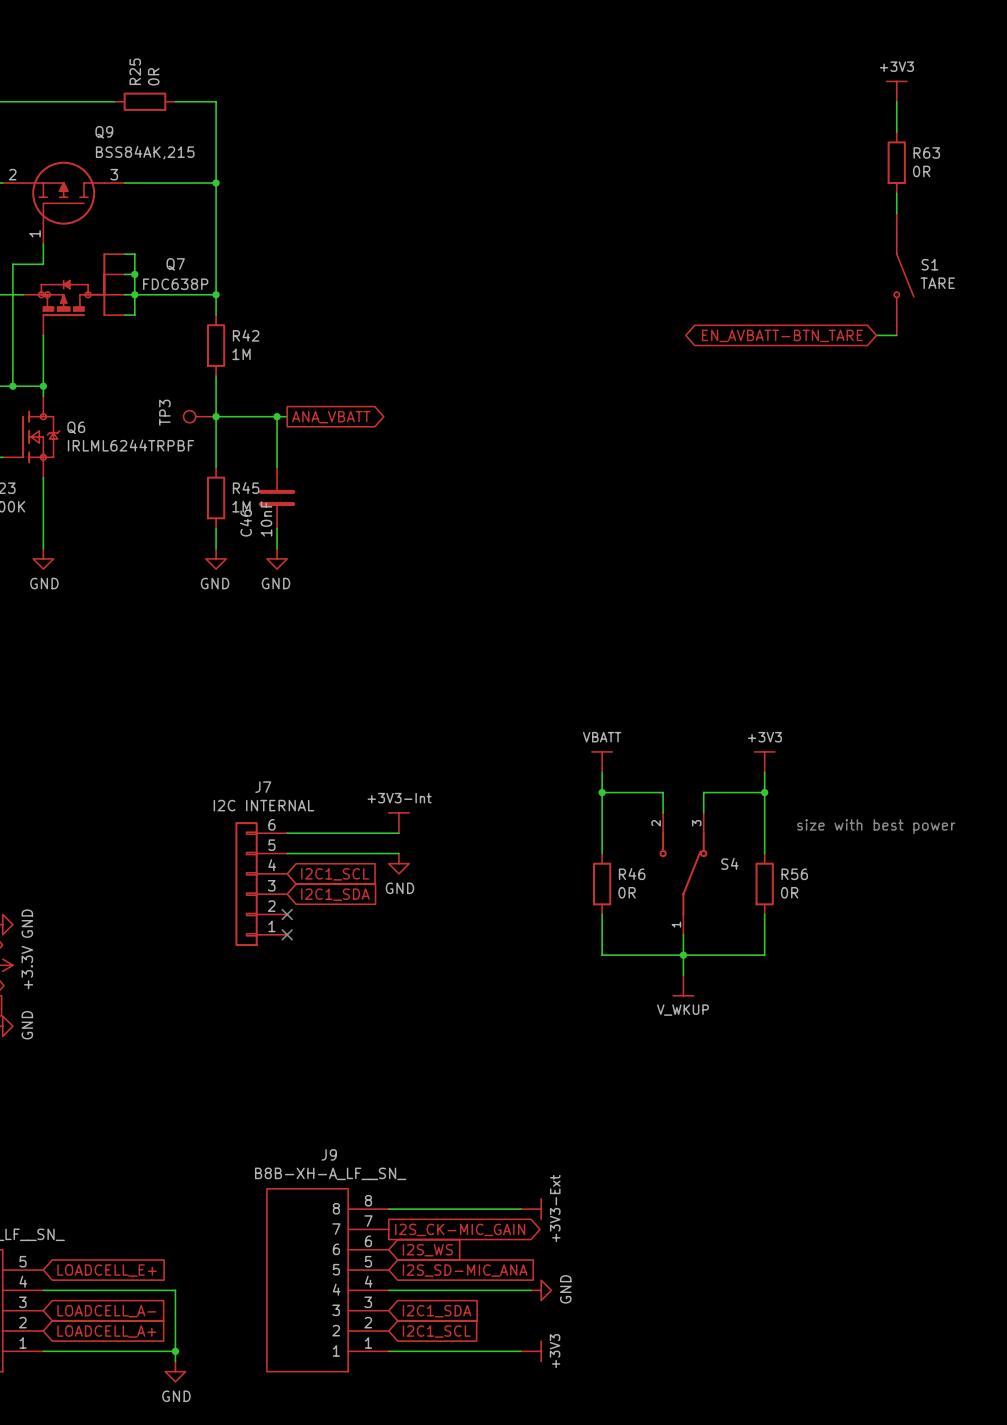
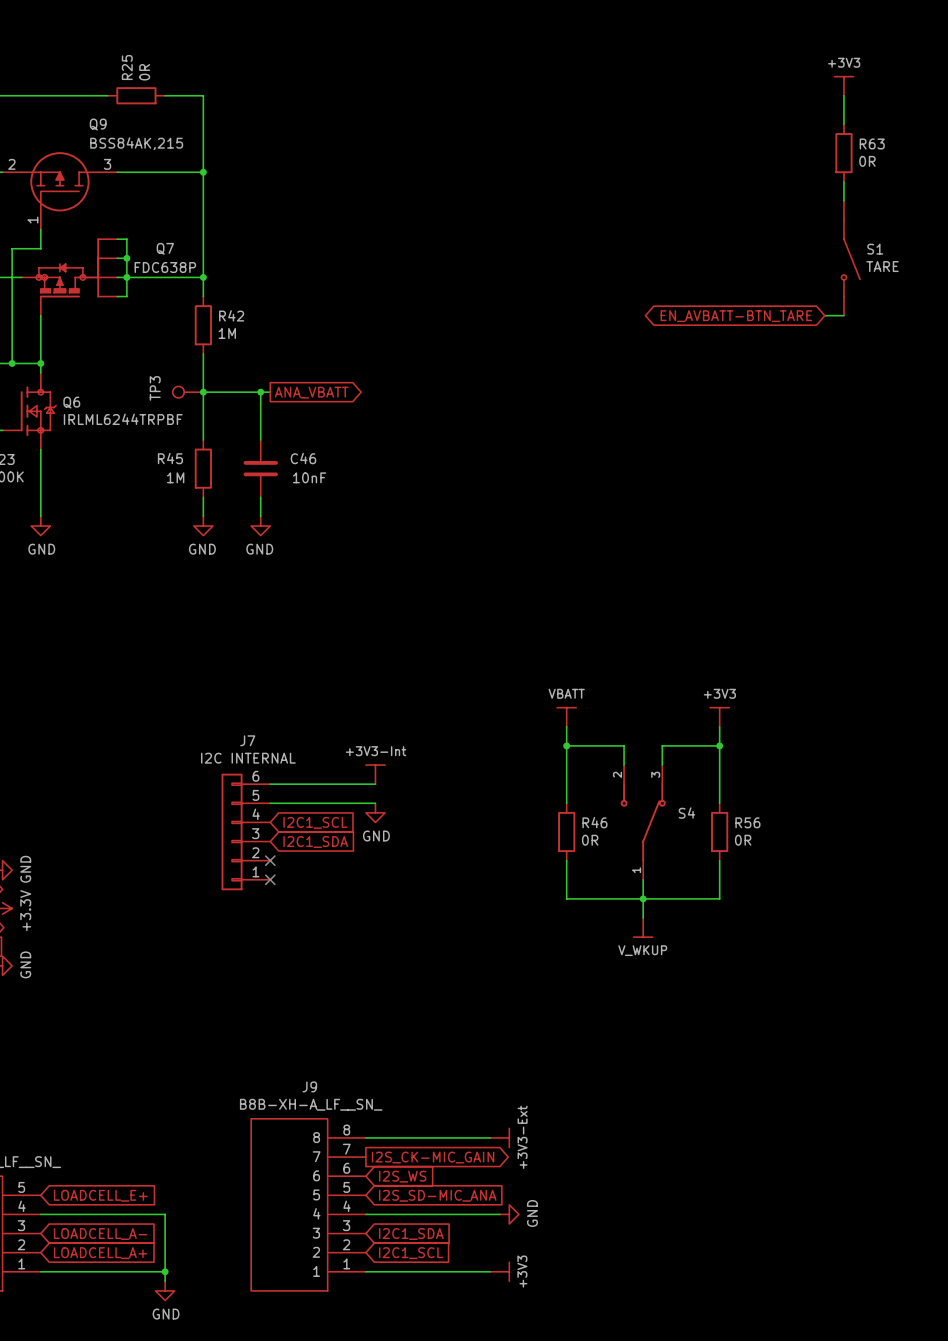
R45 name position: R45 (246, 487) -> R45 (170, 458)
R45 value position: 1M (241, 506) -> 1M (175, 477)
C46 value rotation: 0° (266, 518) -> 90° clockwise (309, 477)
C46 value position: 10nF (266, 518) -> 10nF (309, 477)
C46 name rotation: 0° (245, 523) -> 90° clockwise (303, 458)
C46 name position: C46 (245, 523) -> C46 (303, 458)
text: size with best power (876, 826) -> none

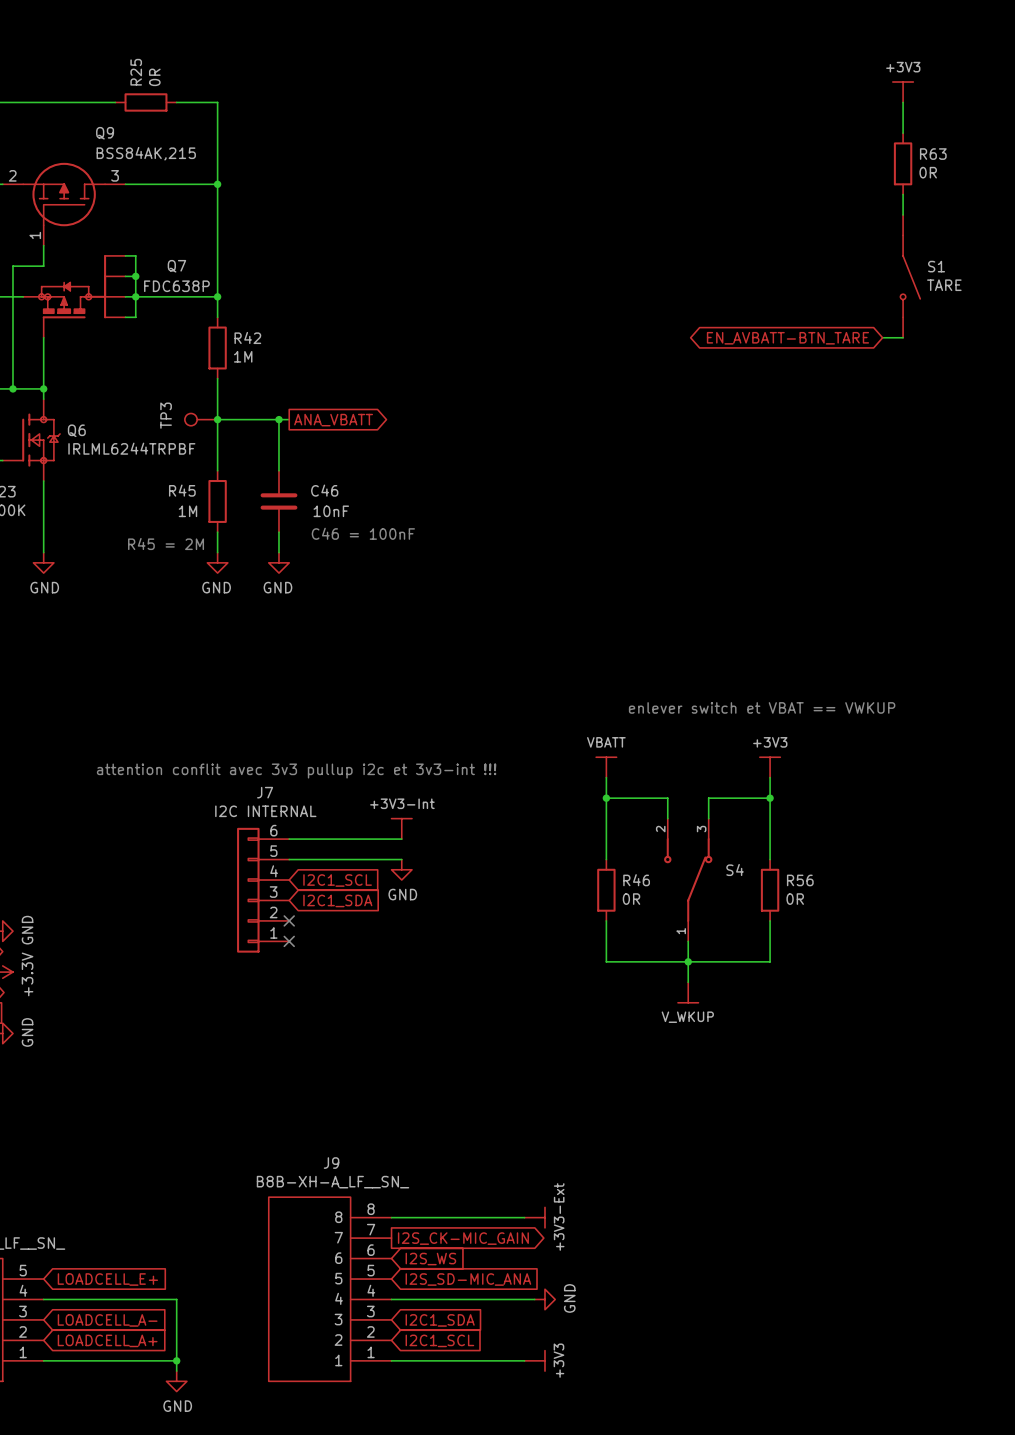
text: none -> C46 = 100nF (363, 533)
text: none -> R45 = 2M (166, 544)
text: none -> enlever switch et VBAT == VWKUP (762, 707)
text: none -> attention conflit avec 3v3 pullup i2c et 3v3-int !!! (296, 771)

